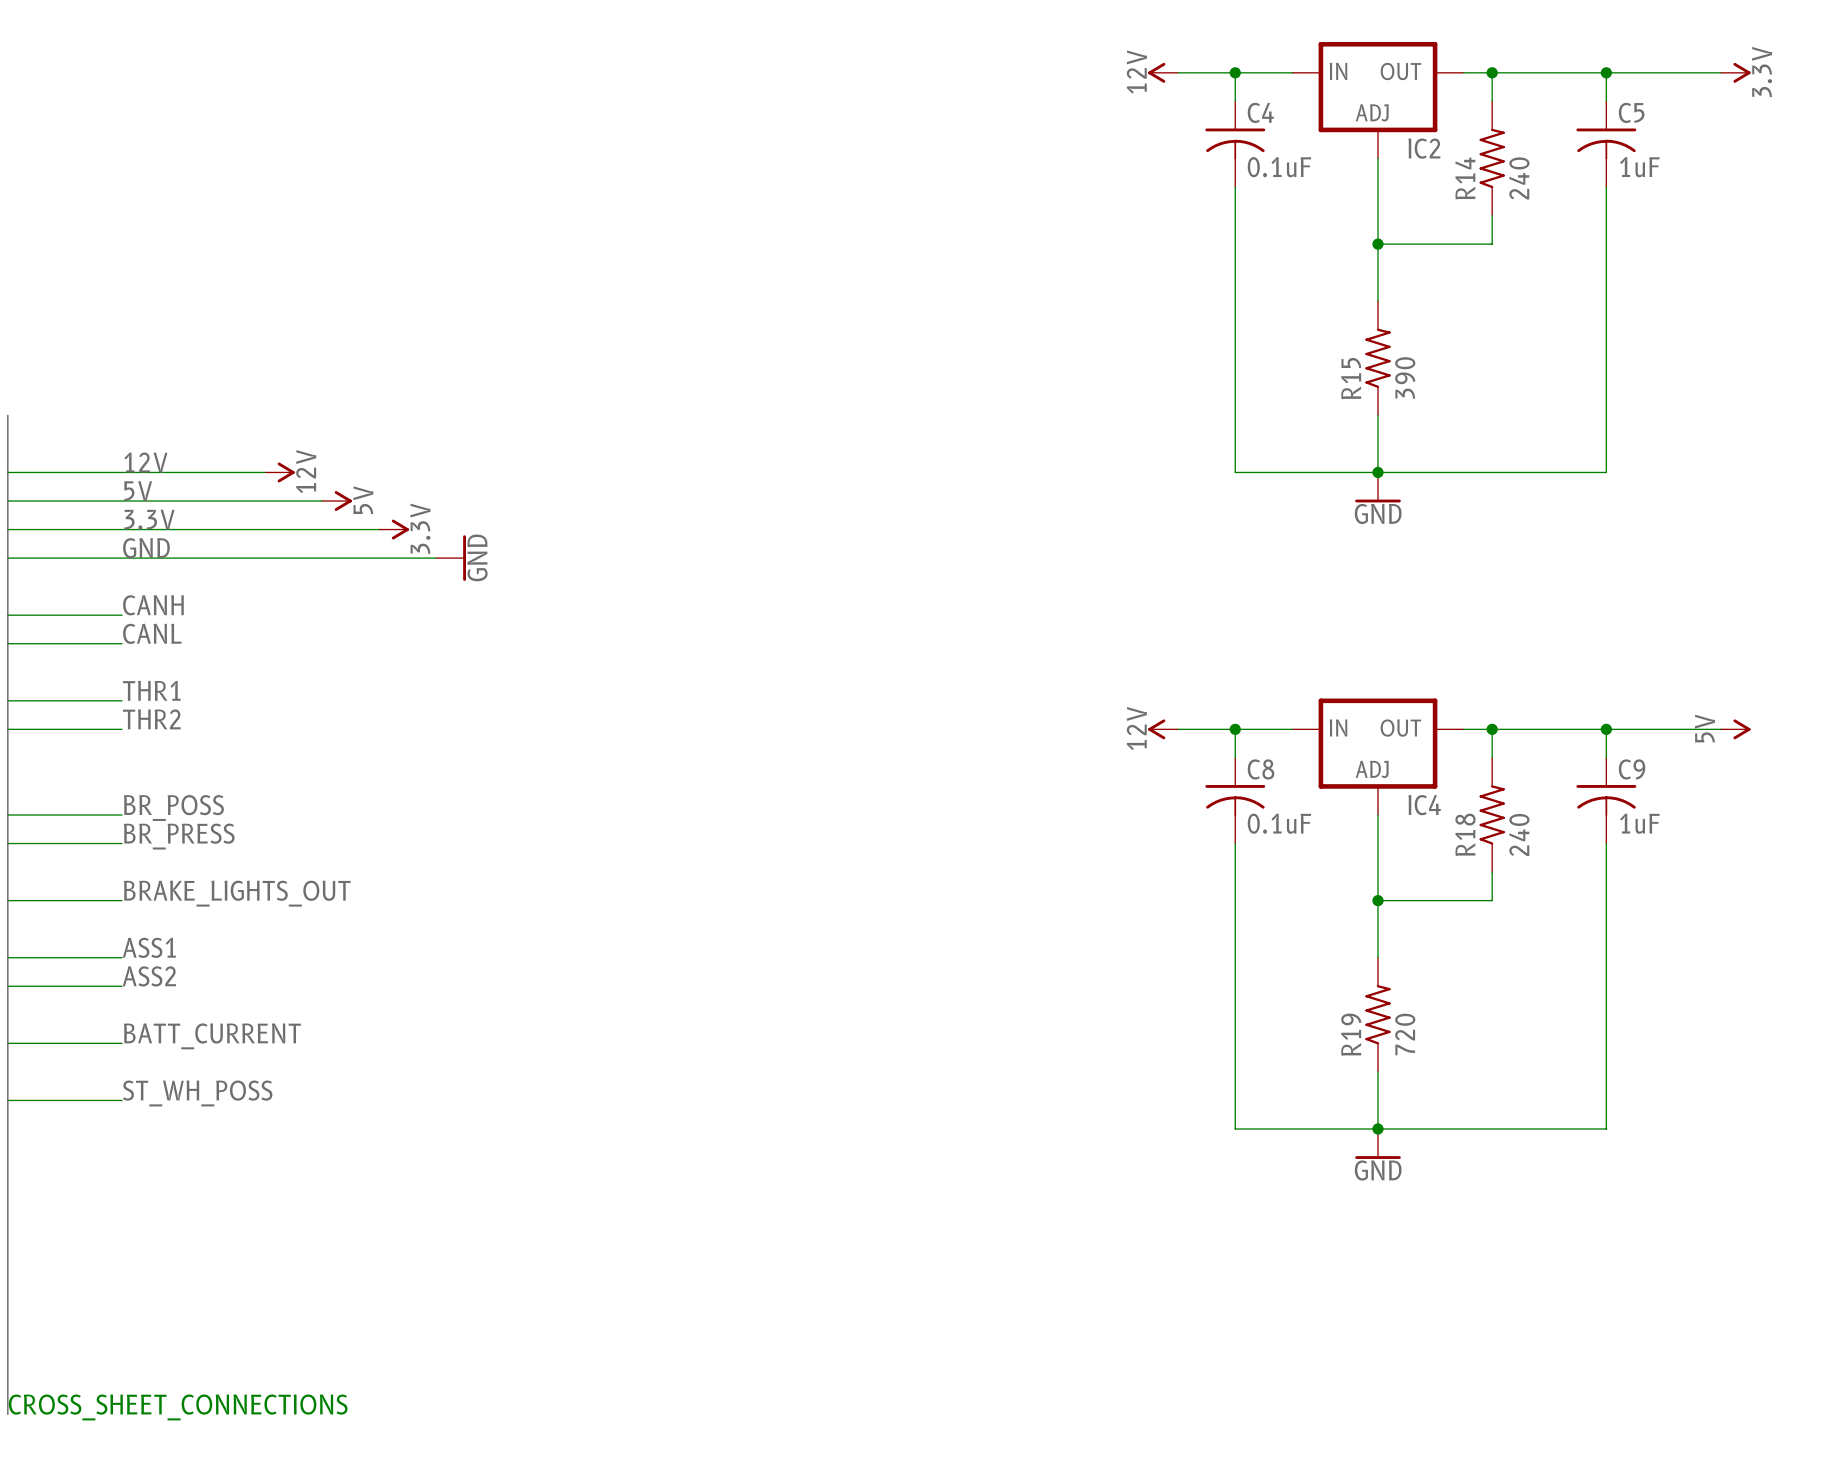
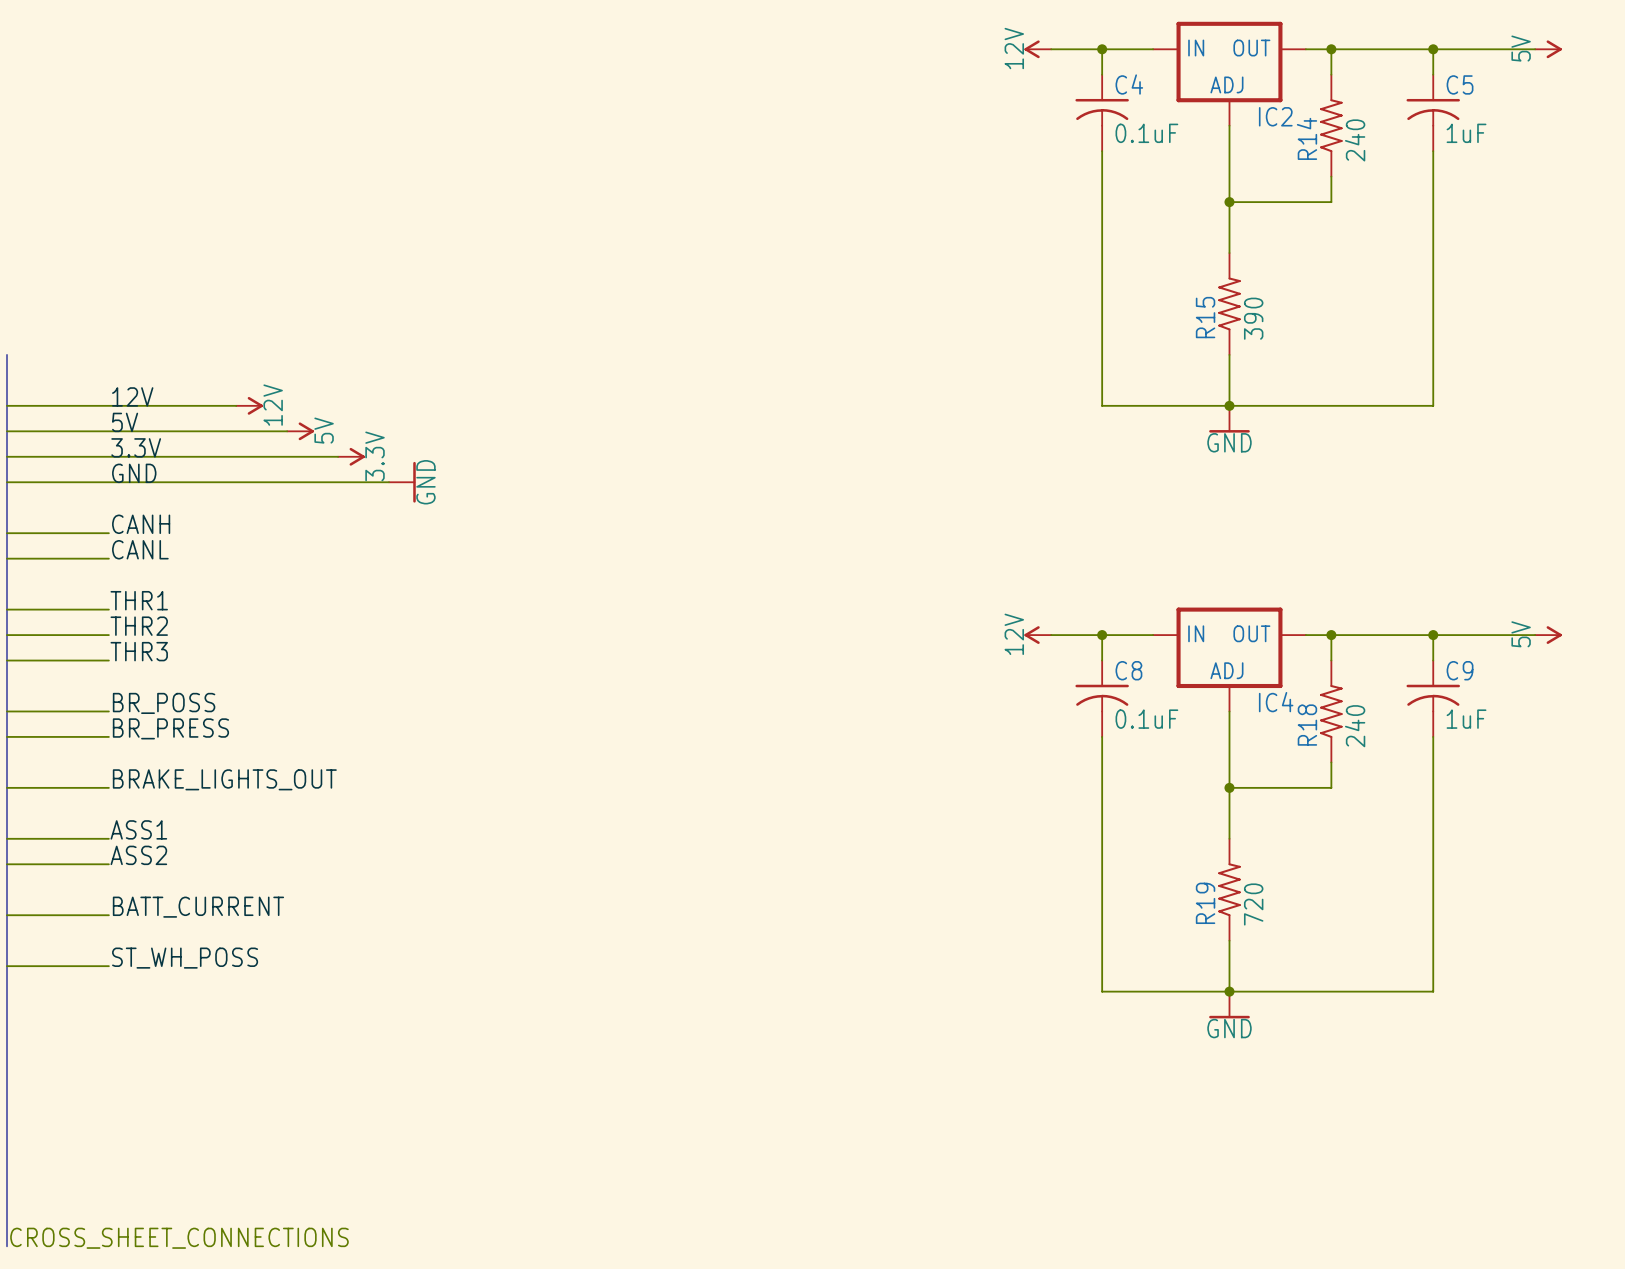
power symbol: 3.3V (1735, 72) -> 5V (1548, 49)
label: none -> THR3 (139, 651)
wire: none -> (7, 660) (108, 660)

